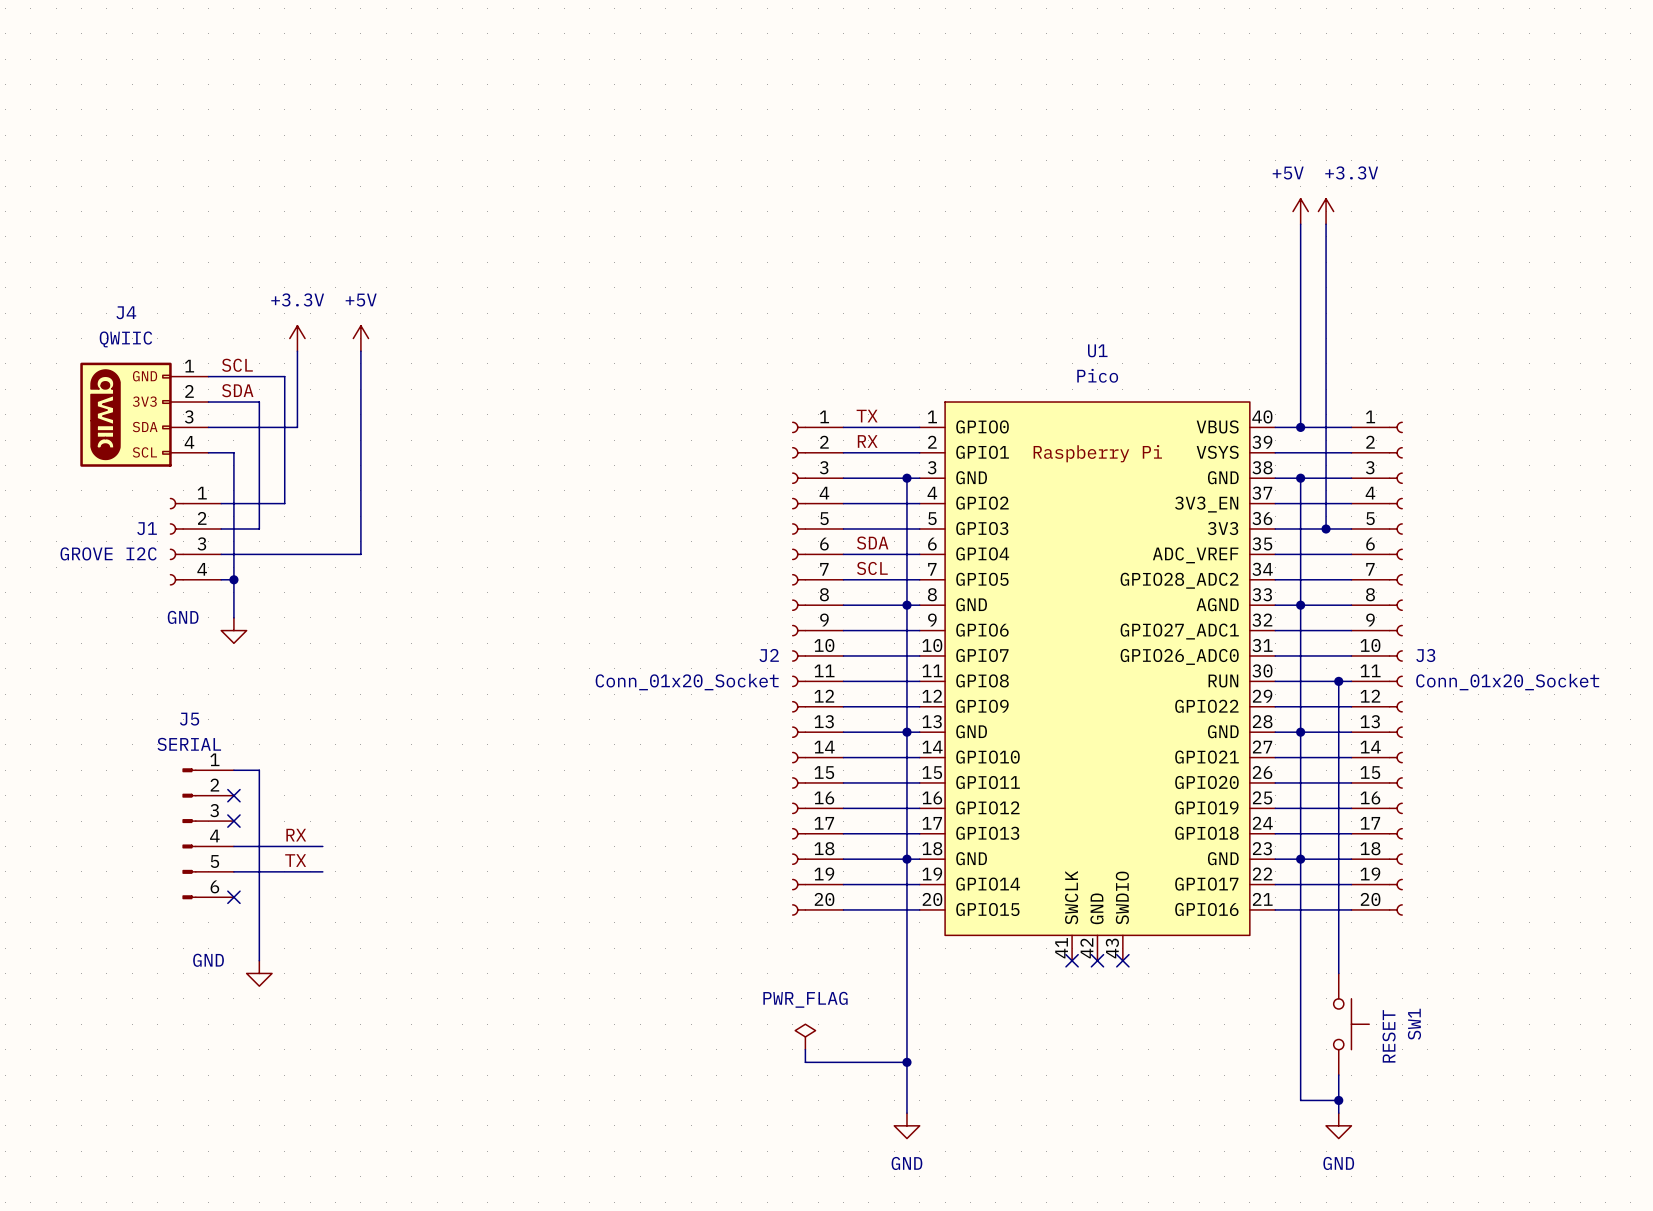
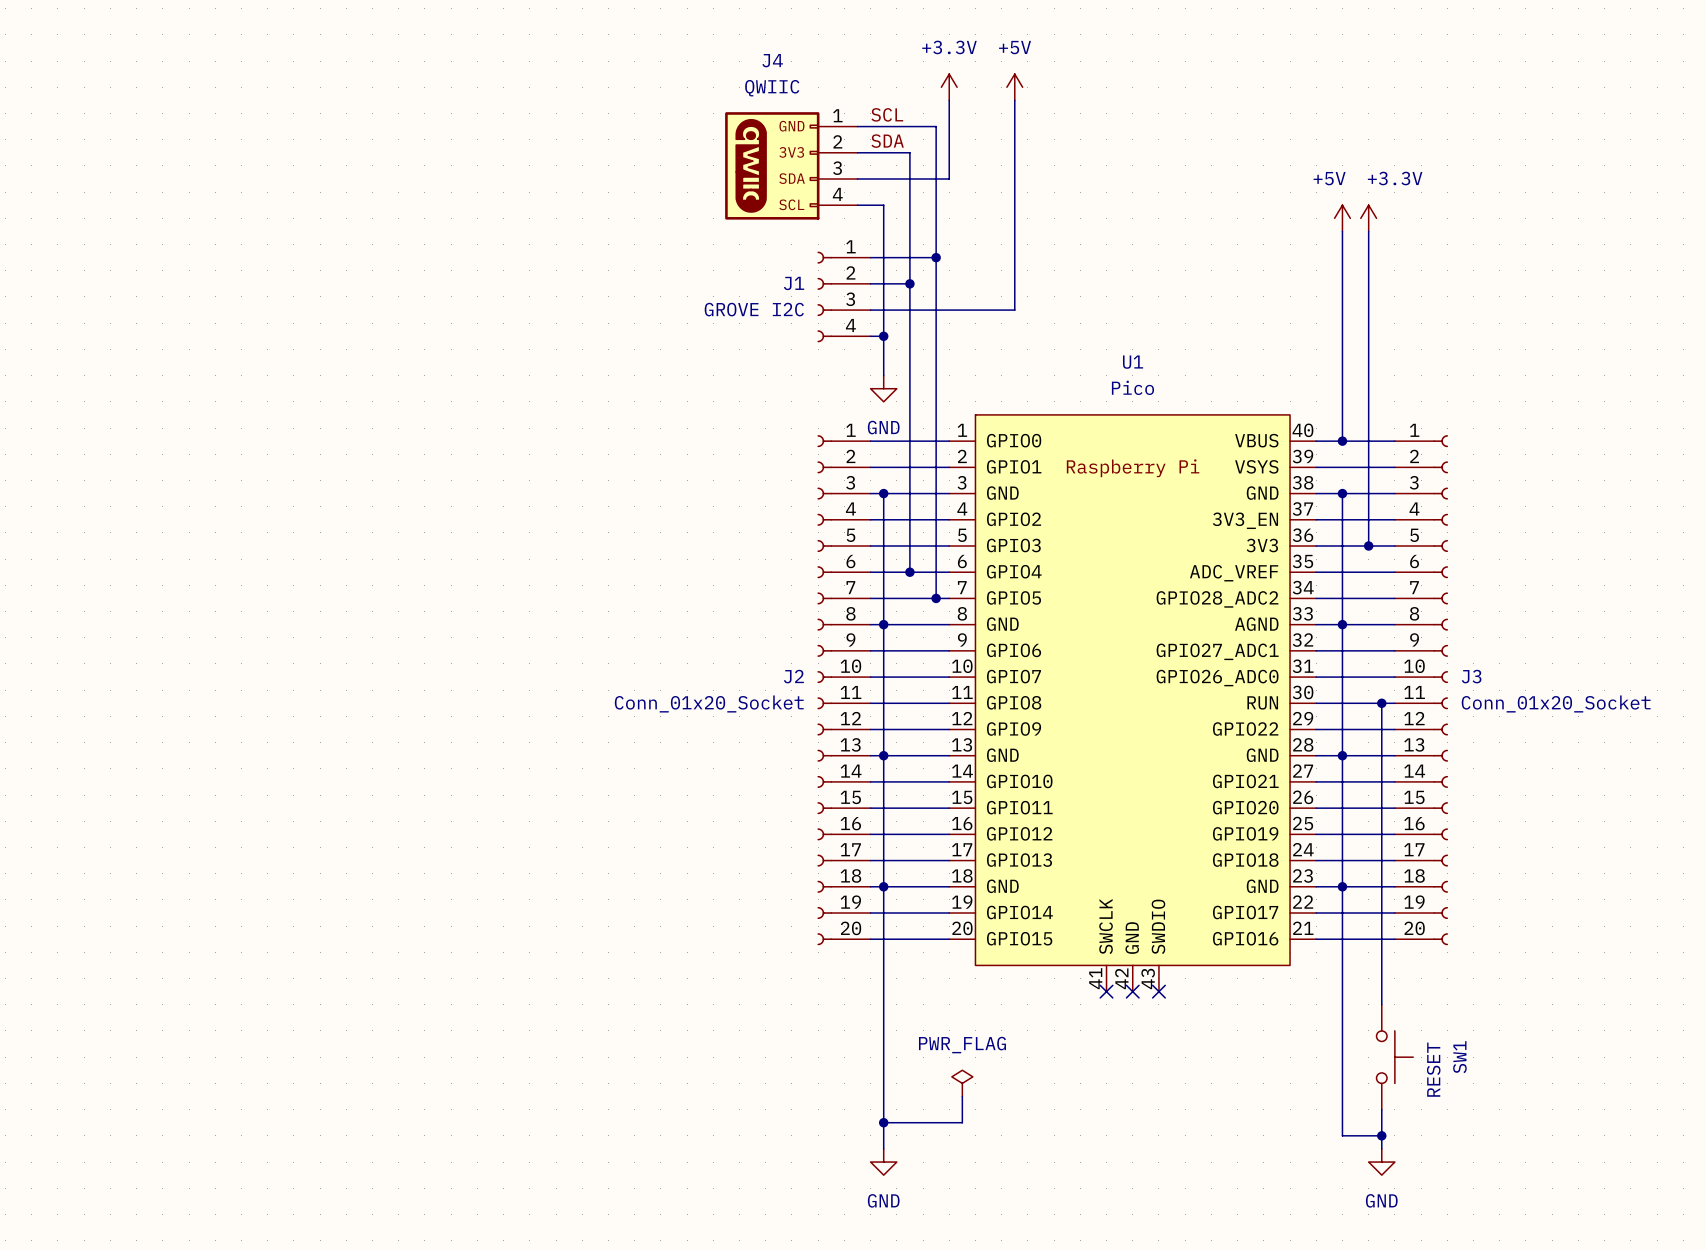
power symbol: none -> +3.3V (949, 87)
power symbol: none -> +5V (1014, 87)
wire: none -> (949, 100) (949, 179) (857, 179)
wire: none -> (1014, 100) (1014, 310) (870, 310)
label: none -> SCL (887, 114)
wire: none -> (857, 126) (936, 126) (936, 493)
label: none -> SDA (887, 141)
wire: none -> (857, 152) (909, 152) (909, 572)
wire: none -> (857, 205) (883, 205) (883, 375)
wire: none -> (870, 257) (936, 257)
junction: none -> (936, 257)
wire: none -> (870, 283) (909, 283)
junction: none -> (909, 283)
wire: none -> (870, 336) (883, 336)
junction: none -> (883, 336)
power symbol: +3.3V (297, 338) -> none
power symbol: +5V (360, 338) -> none
wire: (297, 351) (297, 427) (208, 427) -> none
wire: (360, 351) (360, 554) (221, 554) -> none
label: SCL (237, 365) -> none
wire: (208, 376) (284, 376) (284, 503) (221, 503) -> none
power symbol: none -> GND (883, 388)
label: SDA (237, 390) -> none
wire: (208, 402) (259, 402) (259, 528) (221, 528) -> none
J4 position: (144, 414) -> (791, 165)
label: TX (867, 416) -> none
label: RX (867, 441) -> none
wire: (208, 452) (233, 452) (233, 617) -> none
wire: none -> (883, 493) (883, 1148)
junction: none -> (883, 493)
junction: (906, 478) -> none
J1 position: (195, 541) -> (843, 296)
label: SDA (872, 543) -> none
junction: none -> (909, 572)
label: SCL (872, 568) -> none
wire: (221, 579) (233, 579) -> none
junction: (233, 579) -> none
wire: (906, 579) (906, 1113) -> none
junction: none -> (936, 598)
junction: none -> (883, 624)
junction: (906, 605) -> none
power symbol: GND (233, 630) -> none
junction position: (906, 732) -> (883, 755)
wire: (233, 770) (259, 770) (259, 960) -> none
no-connect mark: (233, 795) -> none
no-connect mark: (233, 821) -> none
J5: SERIAL (208, 833) -> none
label: RX (296, 835) -> none
wire: (233, 846) (322, 846) -> none
junction position: (906, 859) -> (883, 886)
label: TX (295, 860) -> none
wire: (233, 871) (322, 871) -> none
no-connect mark: (233, 897) -> none
power symbol: GND (259, 973) -> none
power symbol position: PWR_FLAG (805, 1036) -> PWR_FLAG (962, 1083)
wire: (805, 1049) (805, 1062) (906, 1062) -> none
junction position: (906, 1062) -> (883, 1122)
wire: none -> (962, 1096) (962, 1122) (883, 1122)
power symbol position: GND (906, 1125) -> GND (883, 1162)

